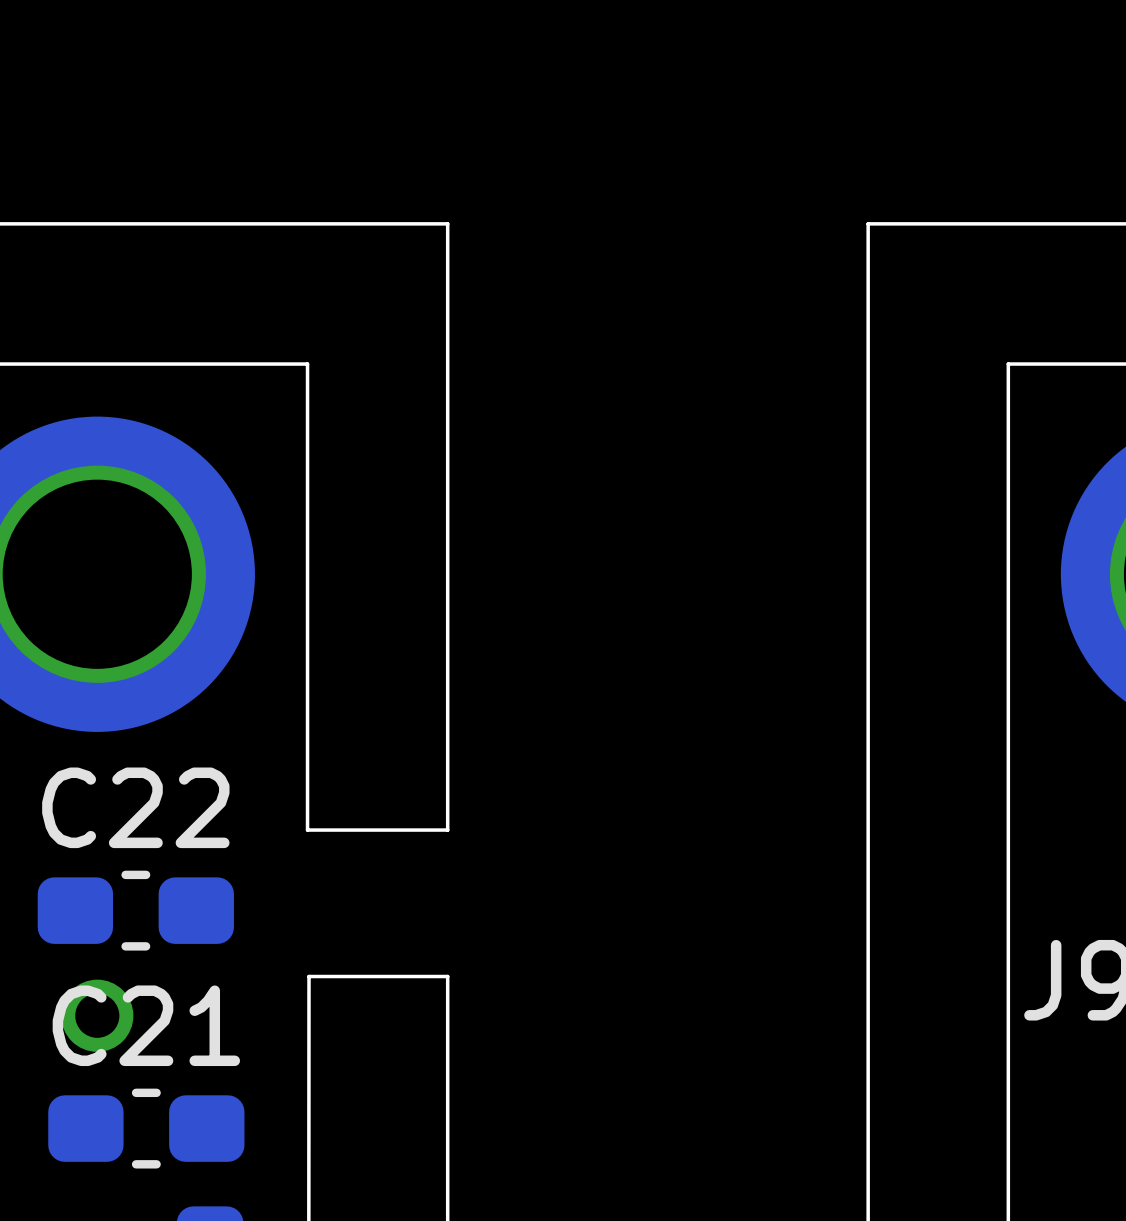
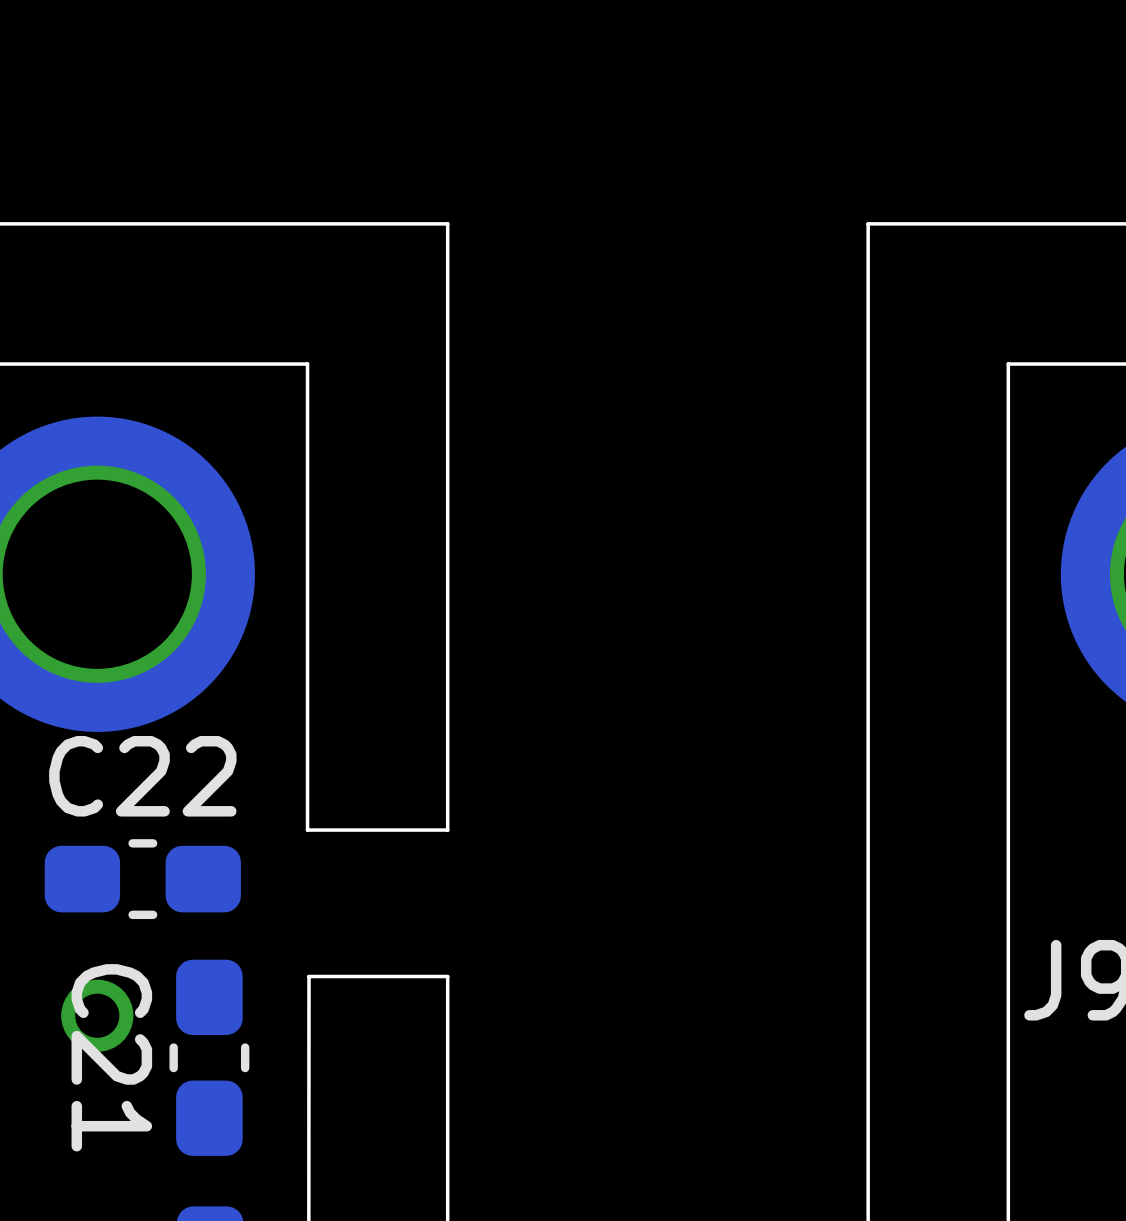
C22 position: (135, 910) -> (142, 879)
C21 name position: C21 (146, 1025) -> C21 (111, 1057)
C21 rotation: 0° (146, 1128) -> 90° clockwise (209, 1057)

